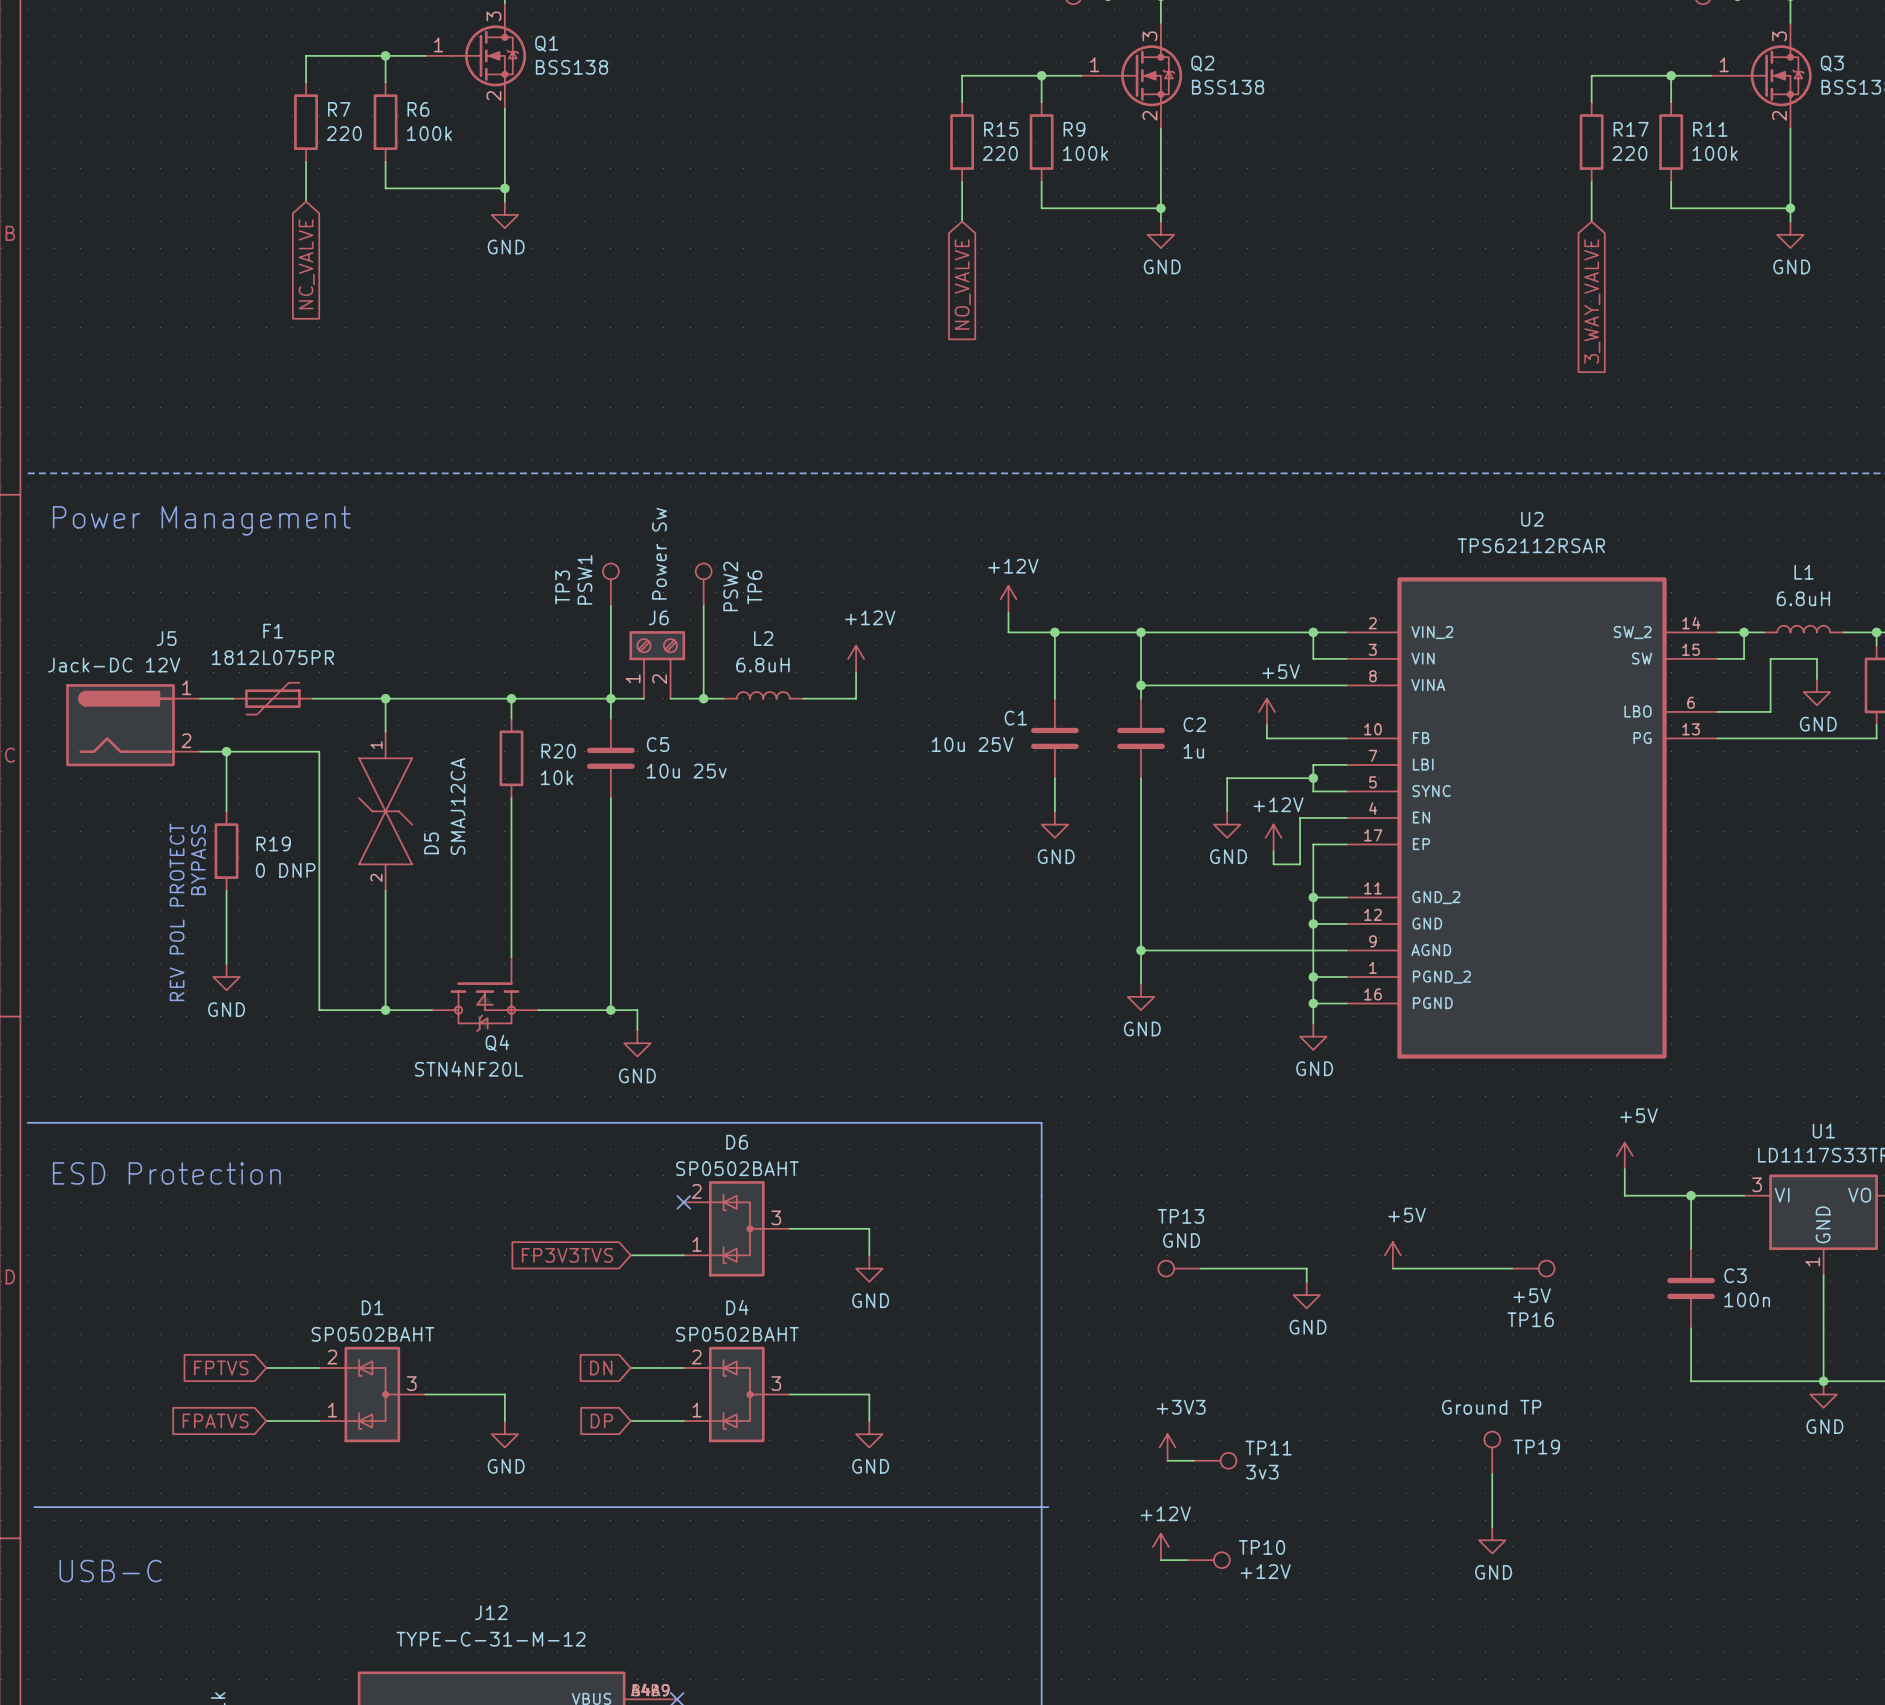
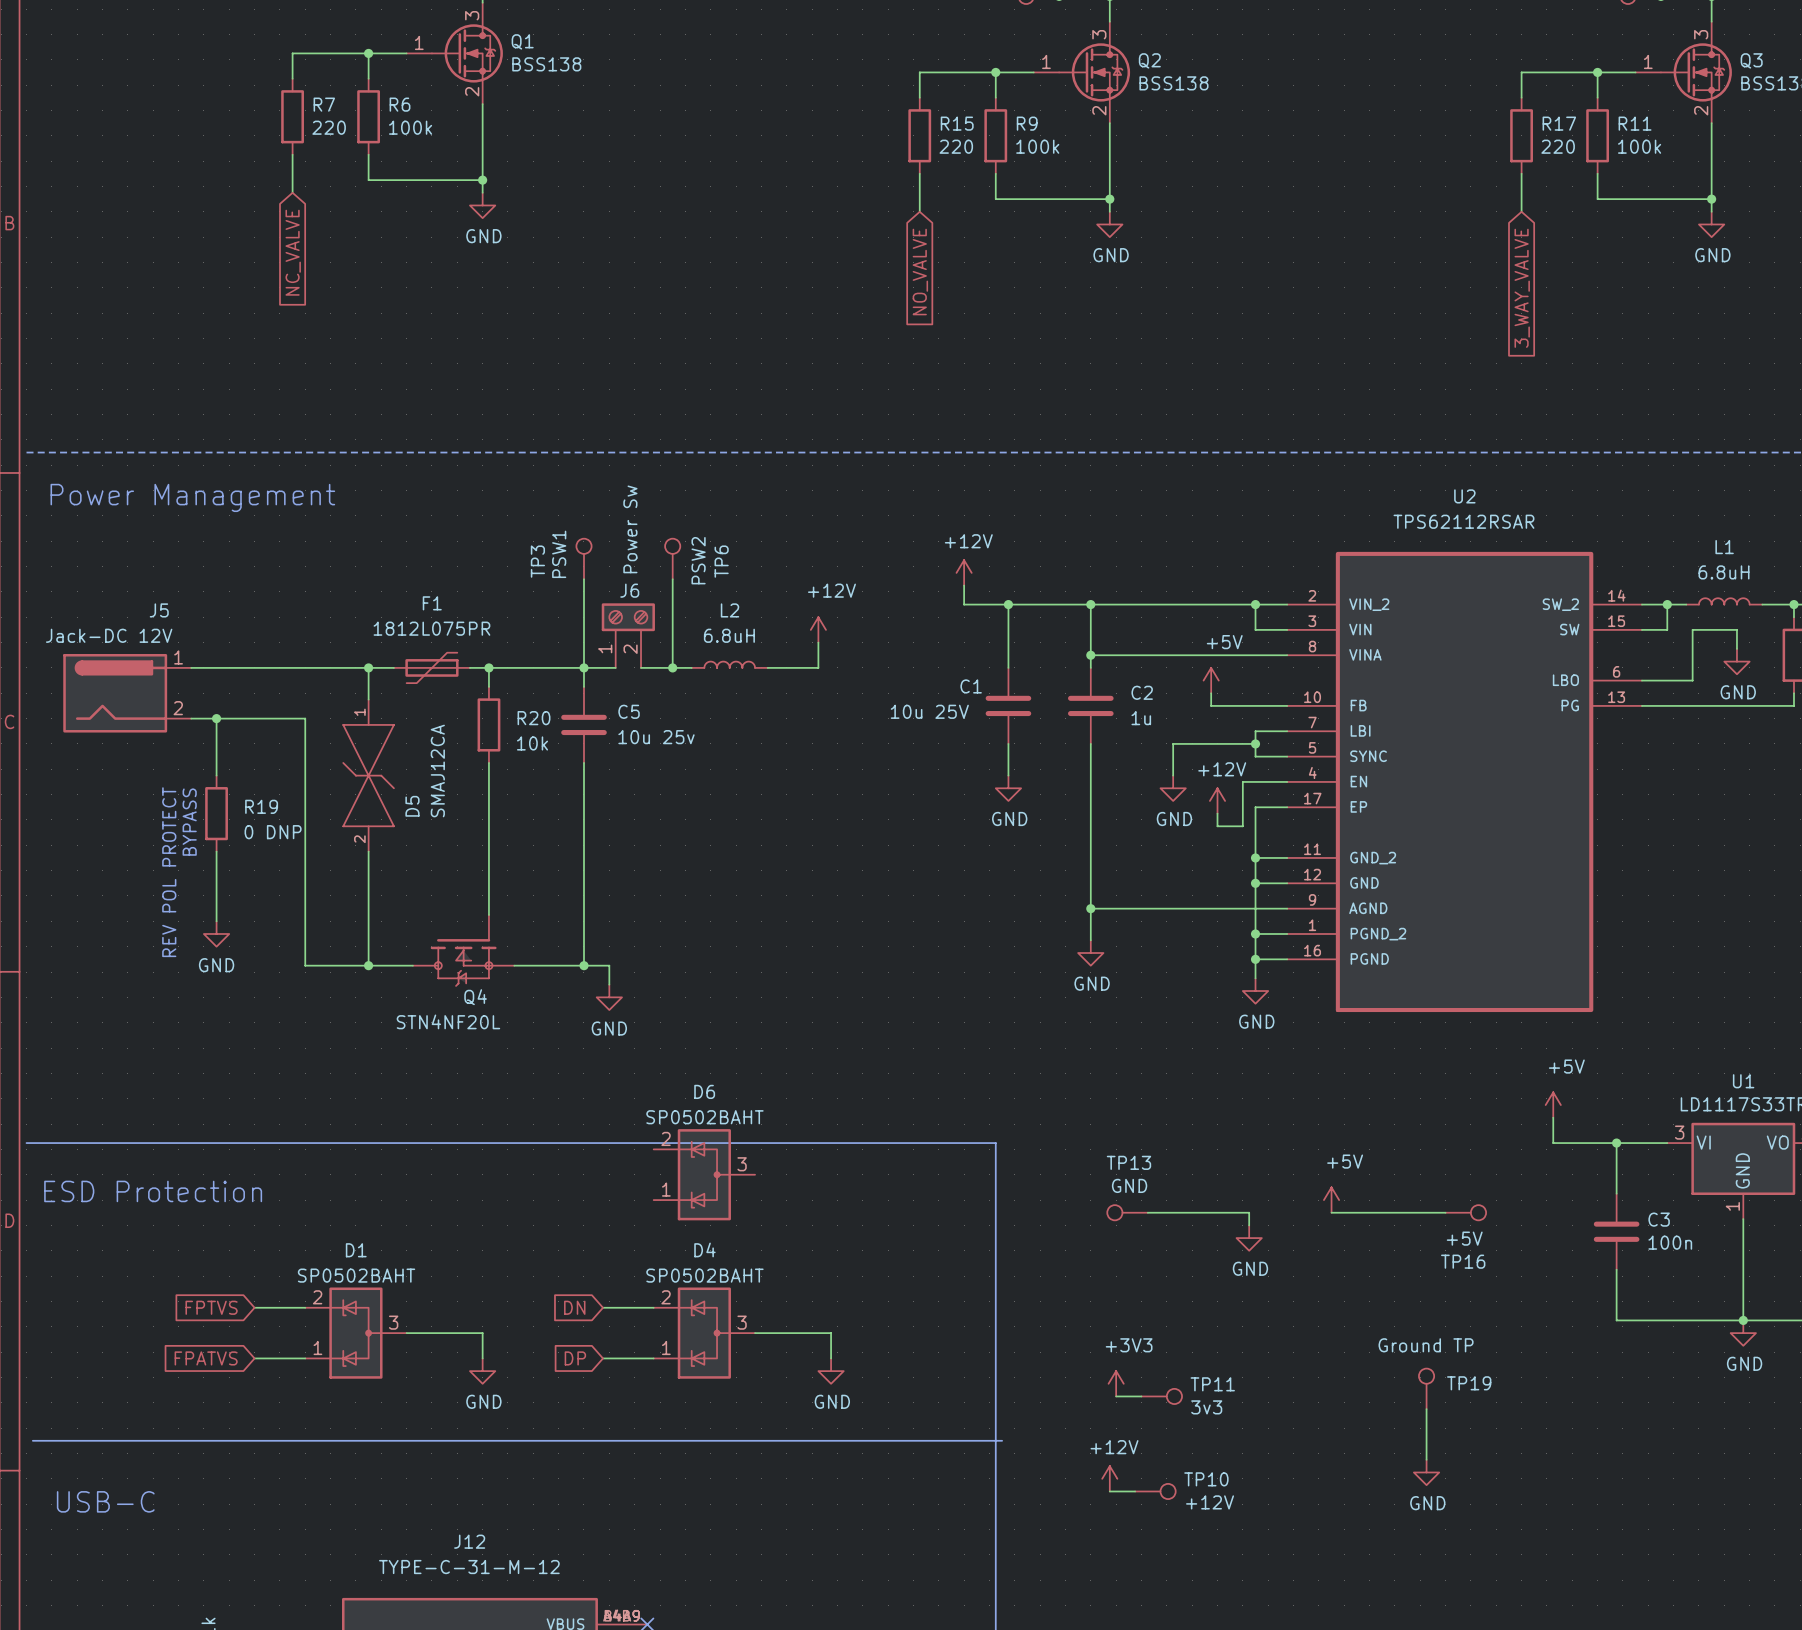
F1 position: (272, 698) -> (431, 667)
line: (27, 1122) (1041, 1122) (1041, 1195) -> (26, 1143) (995, 1143)
text position: ESD Protection (166, 1173) -> ESD Protection (153, 1191)
no-connect mark: (683, 1202) -> none
wire: (789, 1228) (869, 1228) (869, 1255) -> none
global label: FP3V3TVS (567, 1255) -> none
wire: (630, 1255) (683, 1255) -> none
power symbol: GND (869, 1268) -> none

